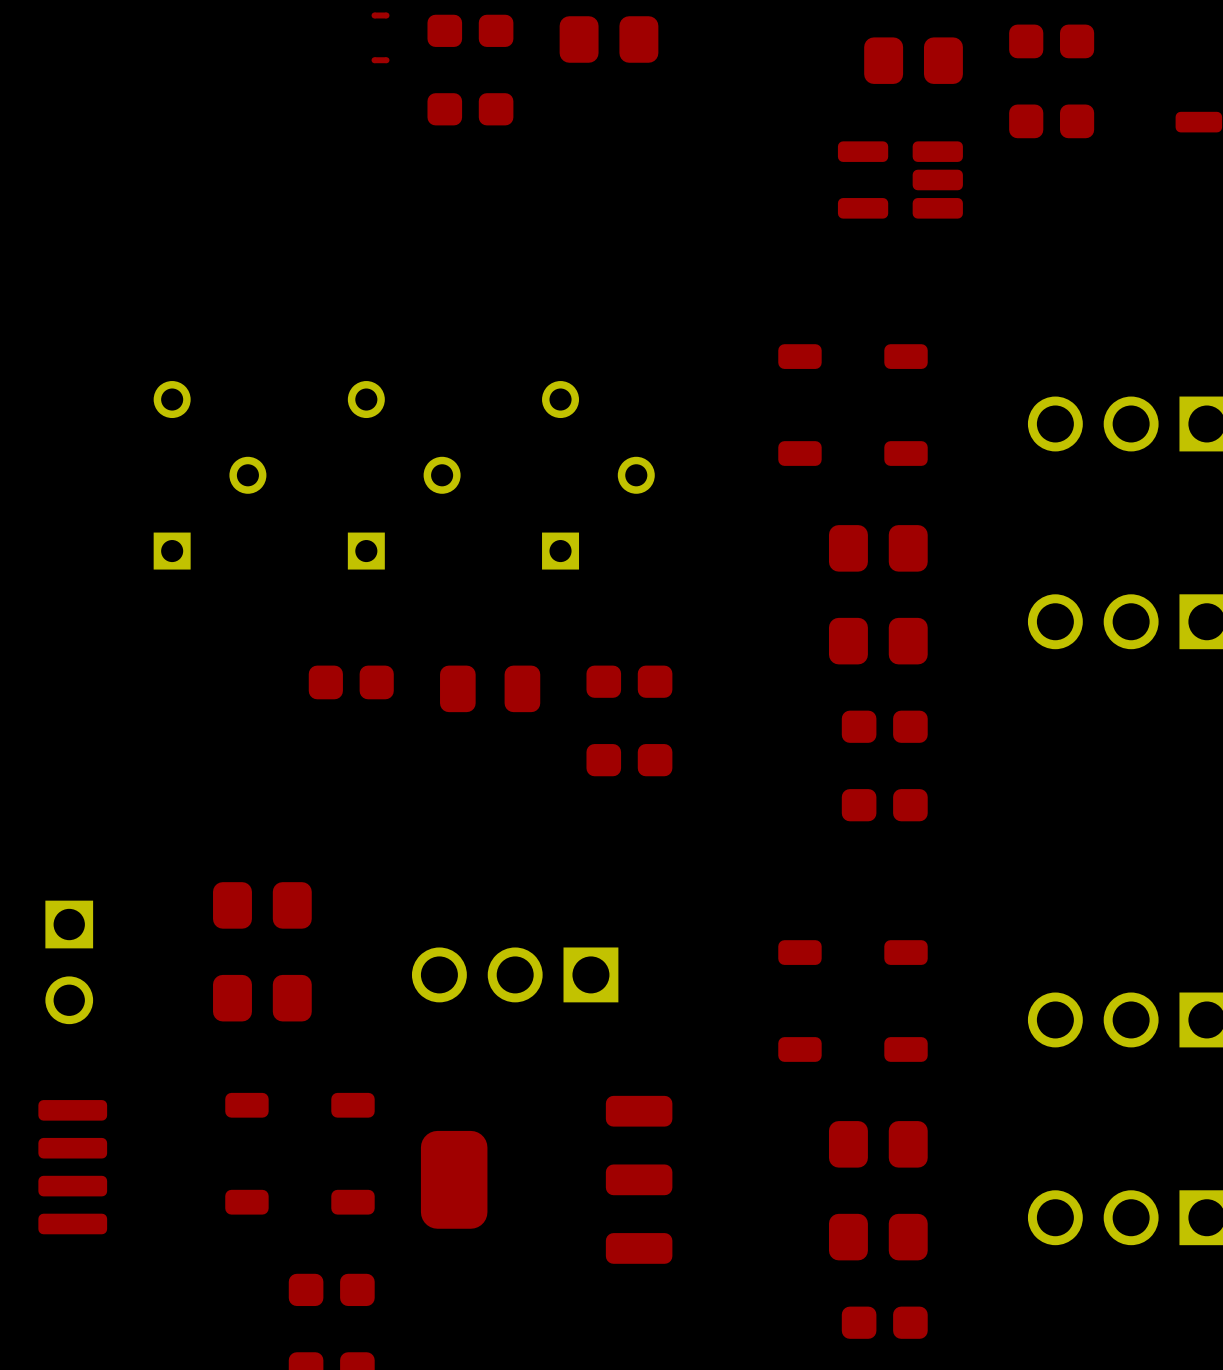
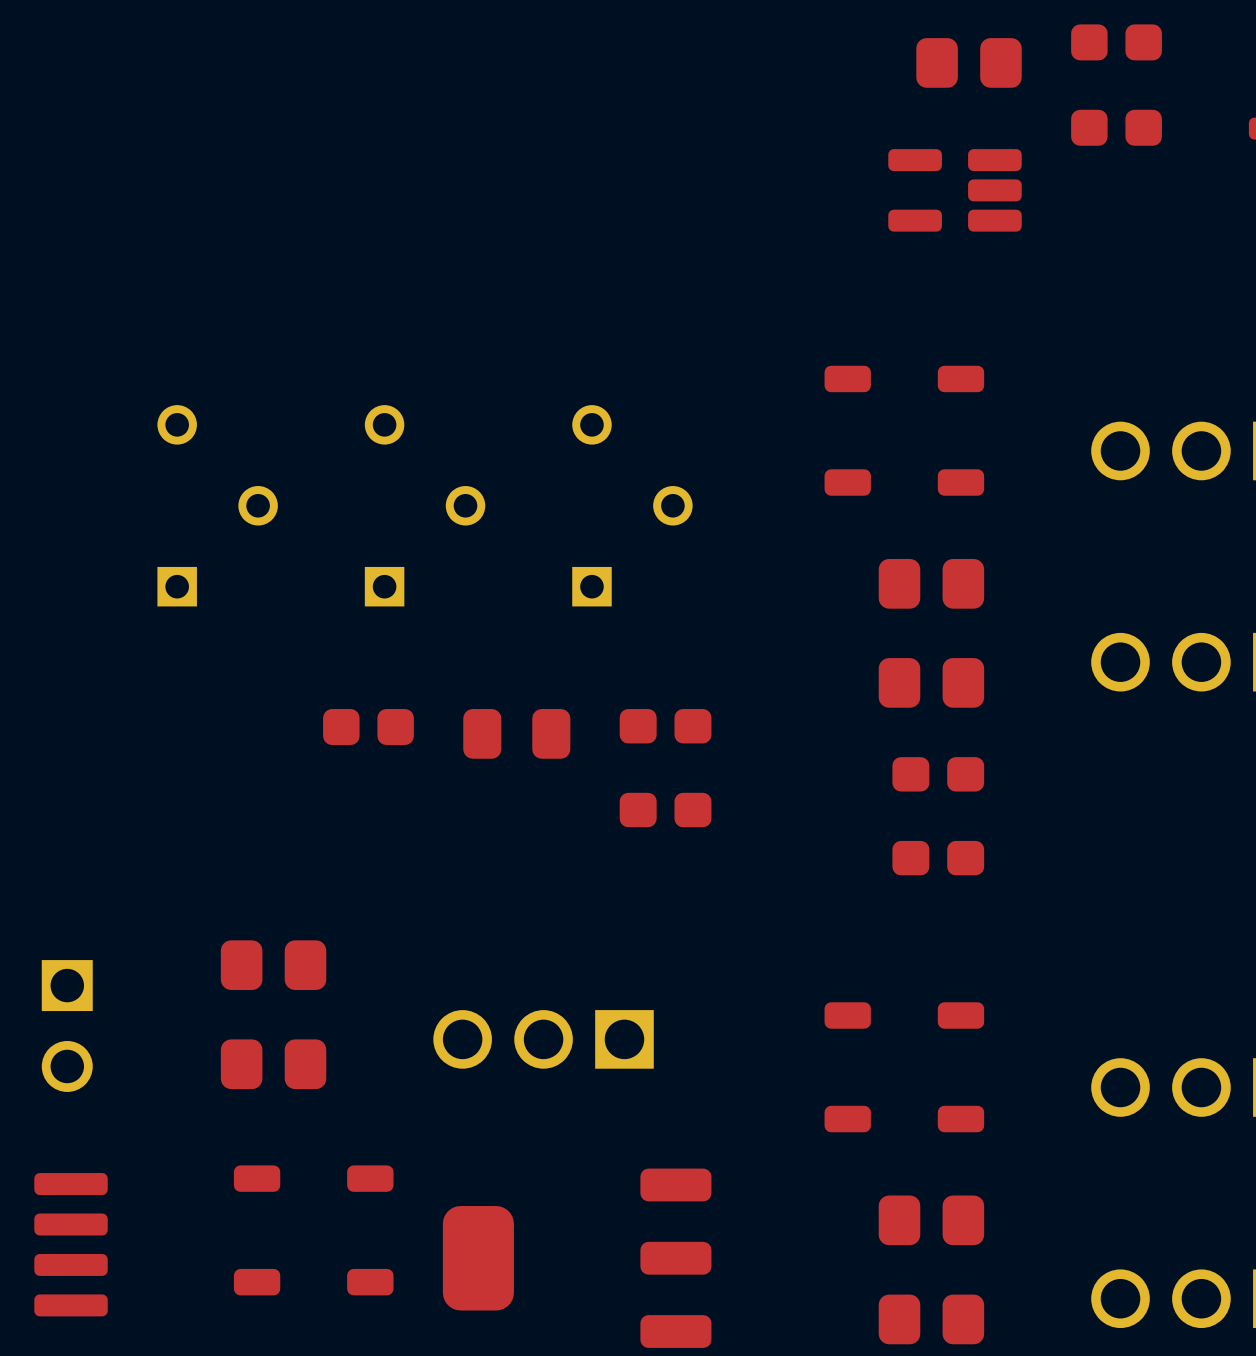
part: (380, 15) -> none
part: (470, 30) -> none
part: (608, 39) -> none
part: (380, 60) -> none
part: (470, 109) -> none

